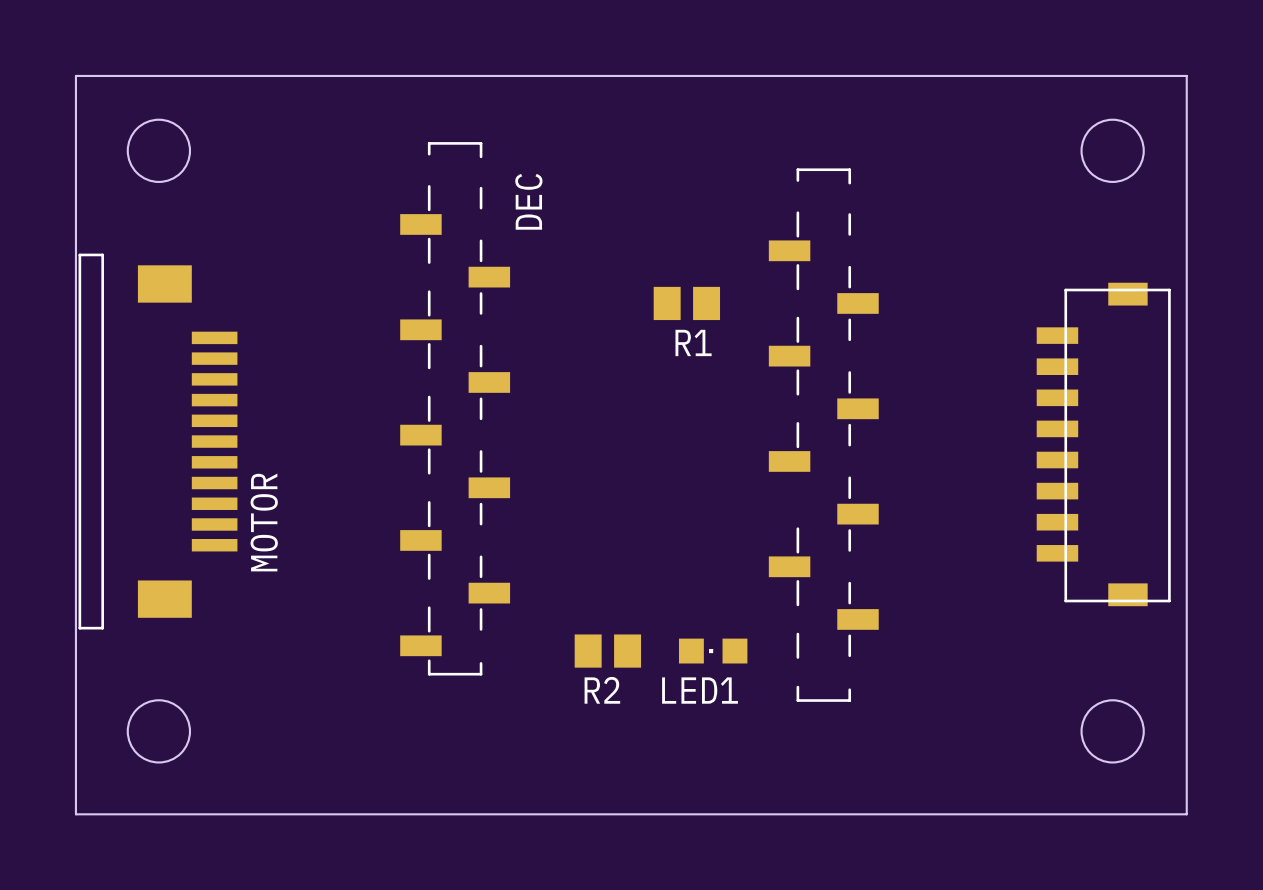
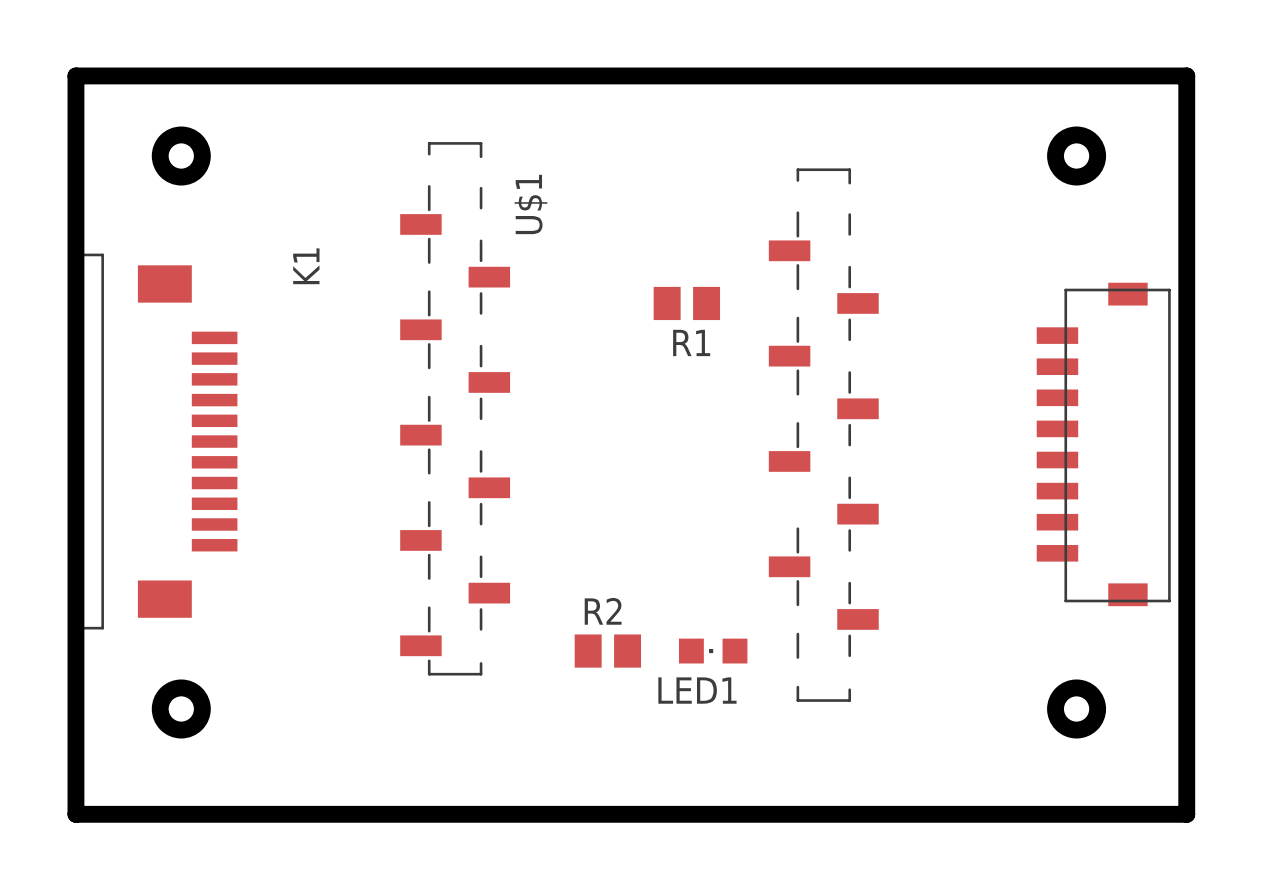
board edge width: thin (75, 75) (1186, 75) (1186, 814) (75, 814) (75, 75) -> thick (75, 75) (1186, 75) (1186, 814) (75, 814) (75, 75)
round board edge: [126, 118, 192, 183] -> none
round board edge: [1080, 118, 1145, 183] -> none
round board edge: none -> [151, 126, 211, 186]
round board edge: none -> [1047, 126, 1107, 186]
DEC name: DEC (528, 201) -> U$1 (530, 204)
MOTOR name: MOTOR (264, 522) -> K1 (306, 266)
round board edge: none -> [151, 679, 211, 739]
round board edge: none -> [1047, 679, 1107, 739]
R2 name position: R2 (602, 690) -> R2 (603, 611)
round board edge: [126, 699, 192, 764] -> none
round board edge: [1080, 699, 1145, 764] -> none

